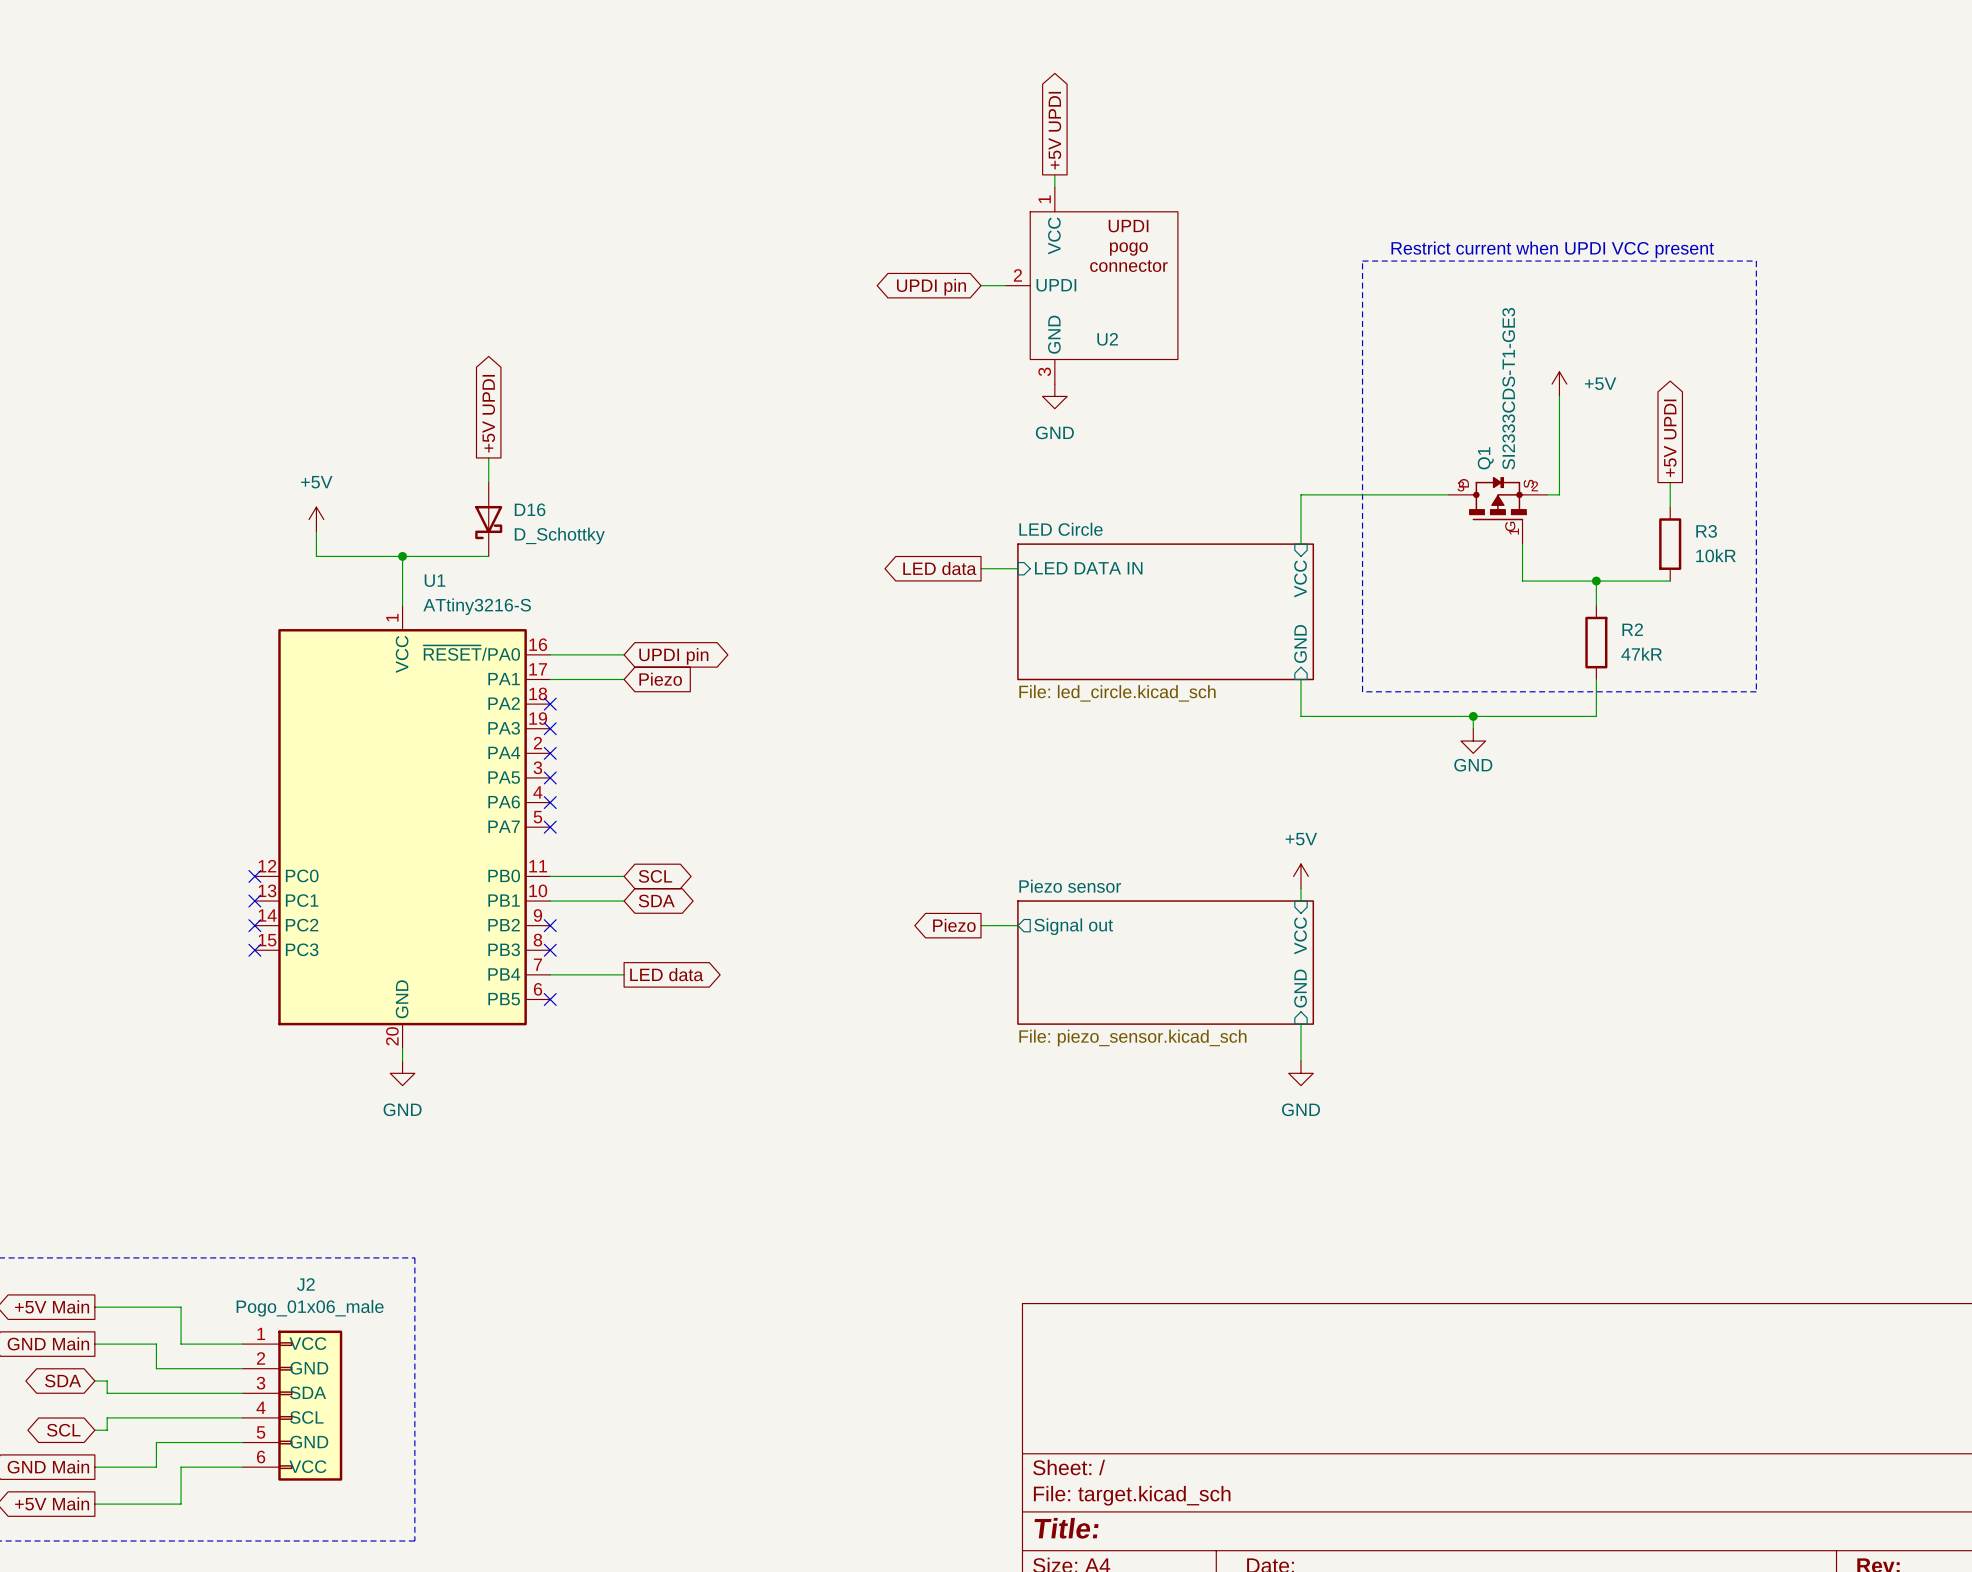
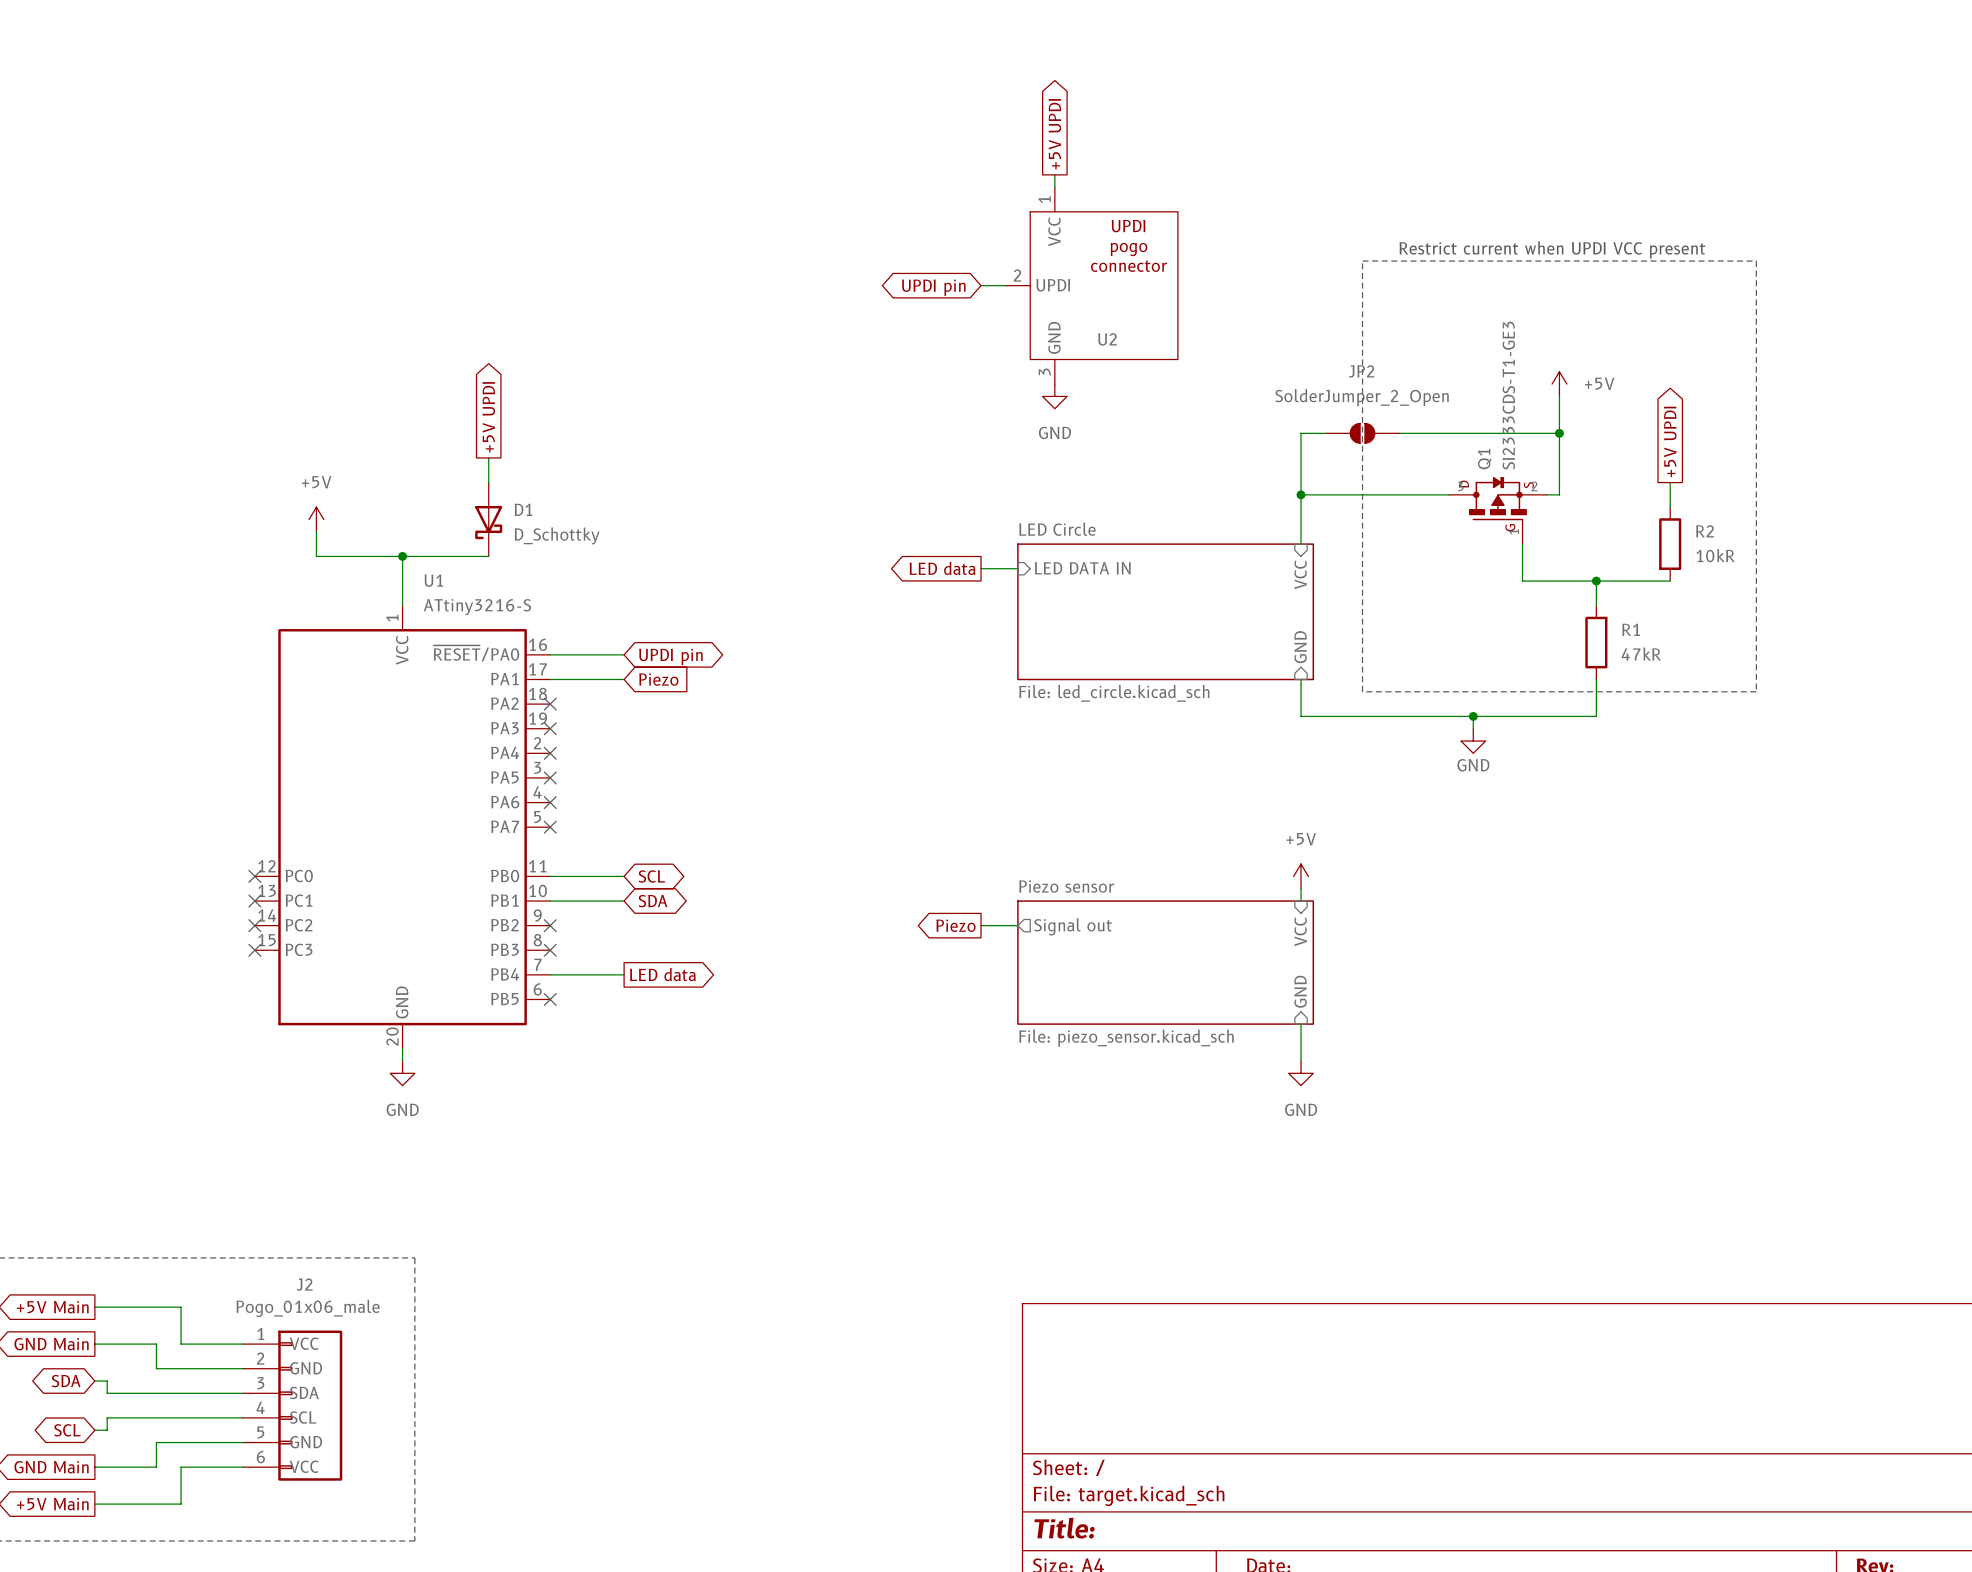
wire: none -> (1325, 433) (1300, 433) (1300, 494)
JP2: none -> SolderJumper_2_Open (1362, 433)
wire: none -> (1399, 433) (1559, 433)
junction: none -> (1559, 433)
junction: none -> (1300, 494)
D16 name: D16 (530, 509) -> D1 (523, 509)
R3 name: R3 (1706, 531) -> R2 (1704, 531)
R2 name: R2 (1632, 629) -> R1 (1631, 629)

